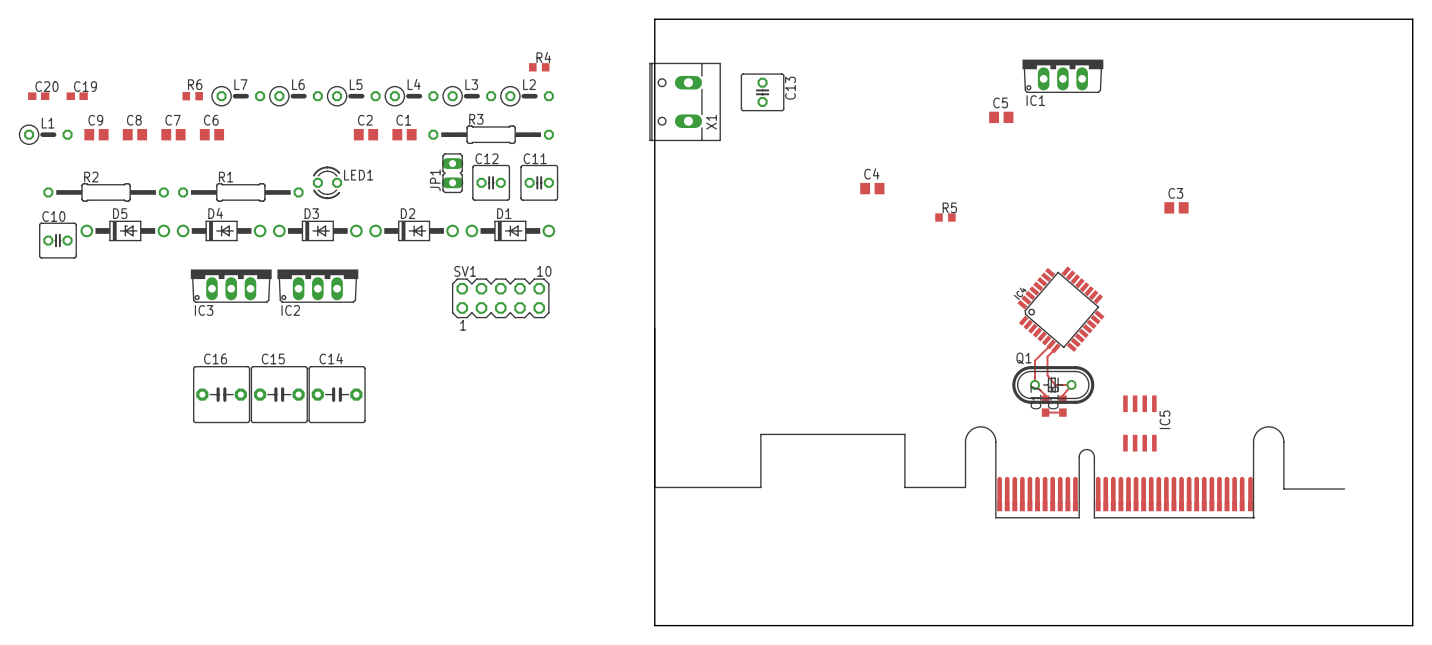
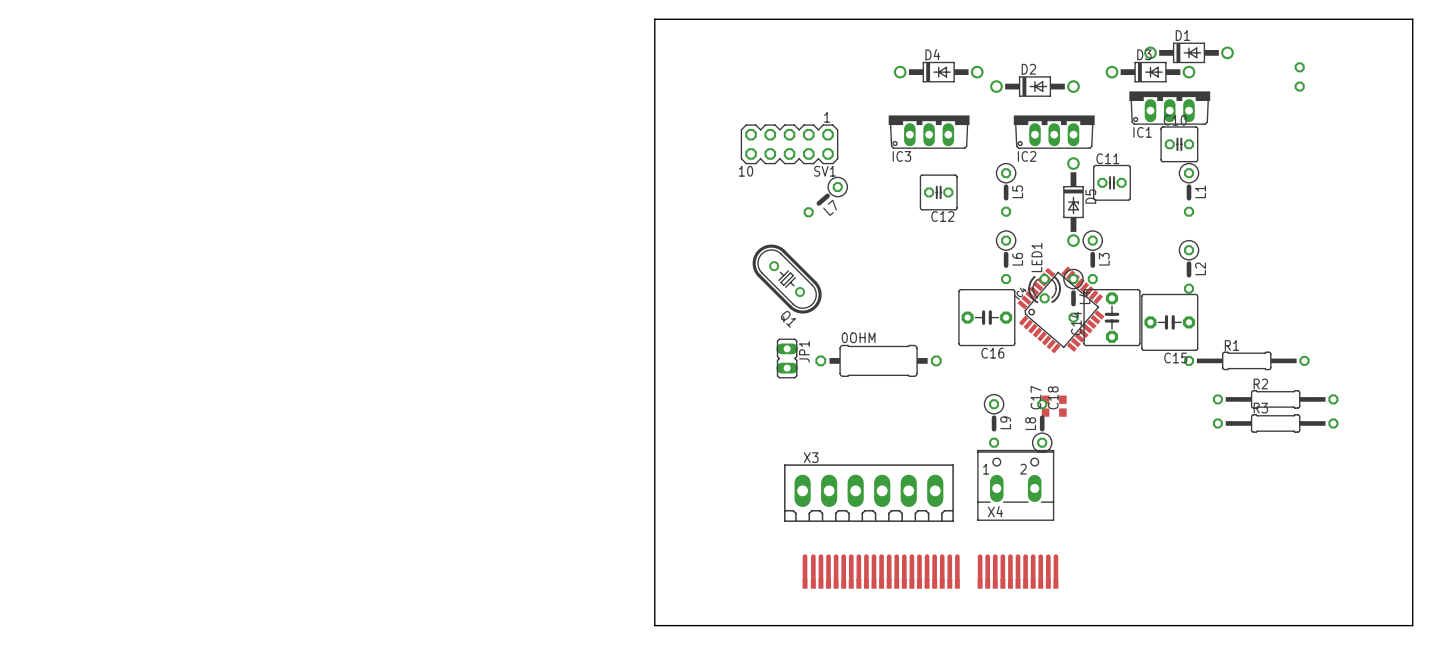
R4: (539, 67) -> none
IC1 position: (1062, 76) -> (1169, 107)
part: none -> (1299, 76)
C13: (762, 92) -> none
C20: (38, 96) -> none
C19: (77, 96) -> none
R6: (192, 96) -> none
L7 rotation: 0° (238, 96) -> 139° clockwise (825, 197)
L7 position: (238, 96) -> (825, 197)
L6 rotation: 0° (296, 96) -> 90° clockwise (1006, 257)
L6 position: (296, 96) -> (1006, 257)
L5 rotation: 0° (353, 96) -> 90° clockwise (1006, 189)
L5 position: (353, 96) -> (1006, 189)
L4 rotation: 0° (411, 96) -> 90° clockwise (1073, 295)
L4 position: (411, 96) -> (1073, 295)
L3 rotation: 0° (469, 96) -> 90° clockwise (1092, 257)
L3 position: (469, 96) -> (1092, 257)
L2 rotation: 0° (527, 96) -> 90° clockwise (1189, 266)
L2 position: (527, 96) -> (1189, 266)
X1: (685, 101) -> none
C5: (1001, 117) -> none
L1 rotation: 0° (45, 134) -> 90° clockwise (1189, 189)
L1 position: (45, 134) -> (1189, 189)
C9: (96, 134) -> none
C8: (134, 134) -> none
C7: (173, 134) -> none
C6: (211, 134) -> none
C2: (365, 134) -> none
C1: (404, 134) -> none
R3 position: (491, 134) -> (1275, 423)
C12 name position: C12 (487, 158) -> C12 (942, 216)
JP1 position: (452, 173) -> (787, 358)
JP1 name position: JP1 (435, 180) -> JP1 (804, 351)
LED1 rotation: 0° (327, 182) -> 90° counterclockwise (1044, 288)
LED1 position: (327, 182) -> (1044, 288)
C12 position: (491, 182) -> (938, 192)
C11 position: (539, 182) -> (1111, 182)
C4: (872, 188) -> none
R2 position: (106, 192) -> (1275, 399)
R1 position: (240, 192) -> (1246, 360)
C3: (1176, 207) -> none
R5: (945, 217) -> none
D5 rotation: 0° (125, 230) -> 90° clockwise (1073, 202)
D5 position: (125, 230) -> (1073, 202)
D4 position: (221, 230) -> (938, 72)
D3 position: (317, 230) -> (1150, 72)
D2 position: (414, 230) -> (1034, 86)
D1 position: (510, 230) -> (1189, 52)
C10 position: (57, 240) -> (1179, 144)
SV1 name position: SV1 (465, 271) -> SV1 (825, 171)
SV1 text position: 10 (544, 271) -> 10 (745, 171)
IC3 position: (231, 286) -> (929, 132)
IC2 position: (317, 286) -> (1054, 132)
SV1 position: (500, 298) -> (789, 144)
SV1 text position: 1 (463, 325) -> 1 (827, 117)
track: (1051, 344) (1034, 360) (1034, 384) (1045, 395) (1045, 399) -> none
track: (1055, 348) (1047, 356) (1047, 375) (1055, 384) (1071, 384) (1062, 395) (1062, 399) -> none
Q1 name position: Q1 (1024, 358) -> Q1 (788, 319)
0OHM: none -> (878, 360)
Q1 rotation: 0° (1053, 384) -> 45° clockwise (787, 279)
Q1 position: (1053, 384) -> (787, 279)
C16 rotation: 0° (221, 394) -> 180° (986, 317)
C16 position: (221, 394) -> (986, 317)
C15 rotation: 0° (279, 394) -> 180° (1169, 322)
C15 position: (279, 394) -> (1169, 322)
C14 rotation: 0° (337, 394) -> 90° counterclockwise (1111, 317)
C14 position: (337, 394) -> (1111, 317)
track: (1045, 412) (1062, 412) -> none
L9: none -> (994, 420)
part side: top (999, 423) -> bottom (930, 571)
IC5: (1139, 423) -> none
L8: none -> (1042, 425)
X4: none -> (1015, 485)
X3: none -> (868, 493)

